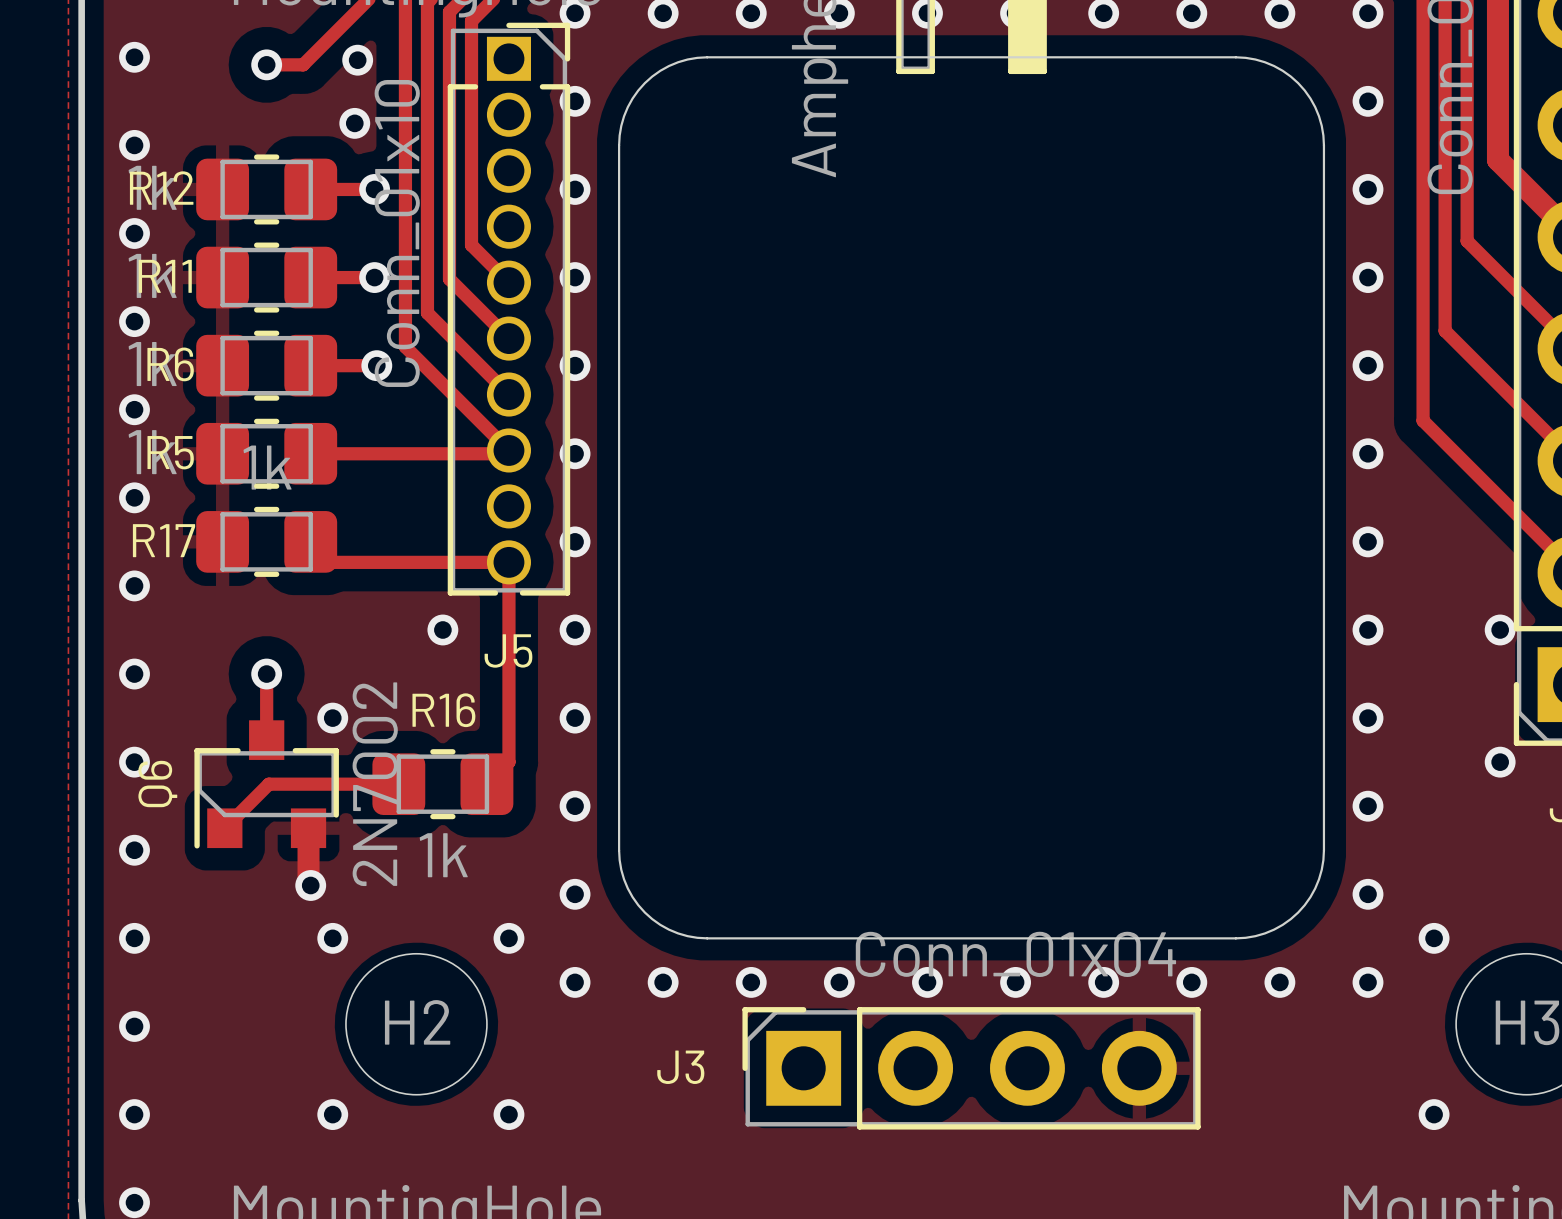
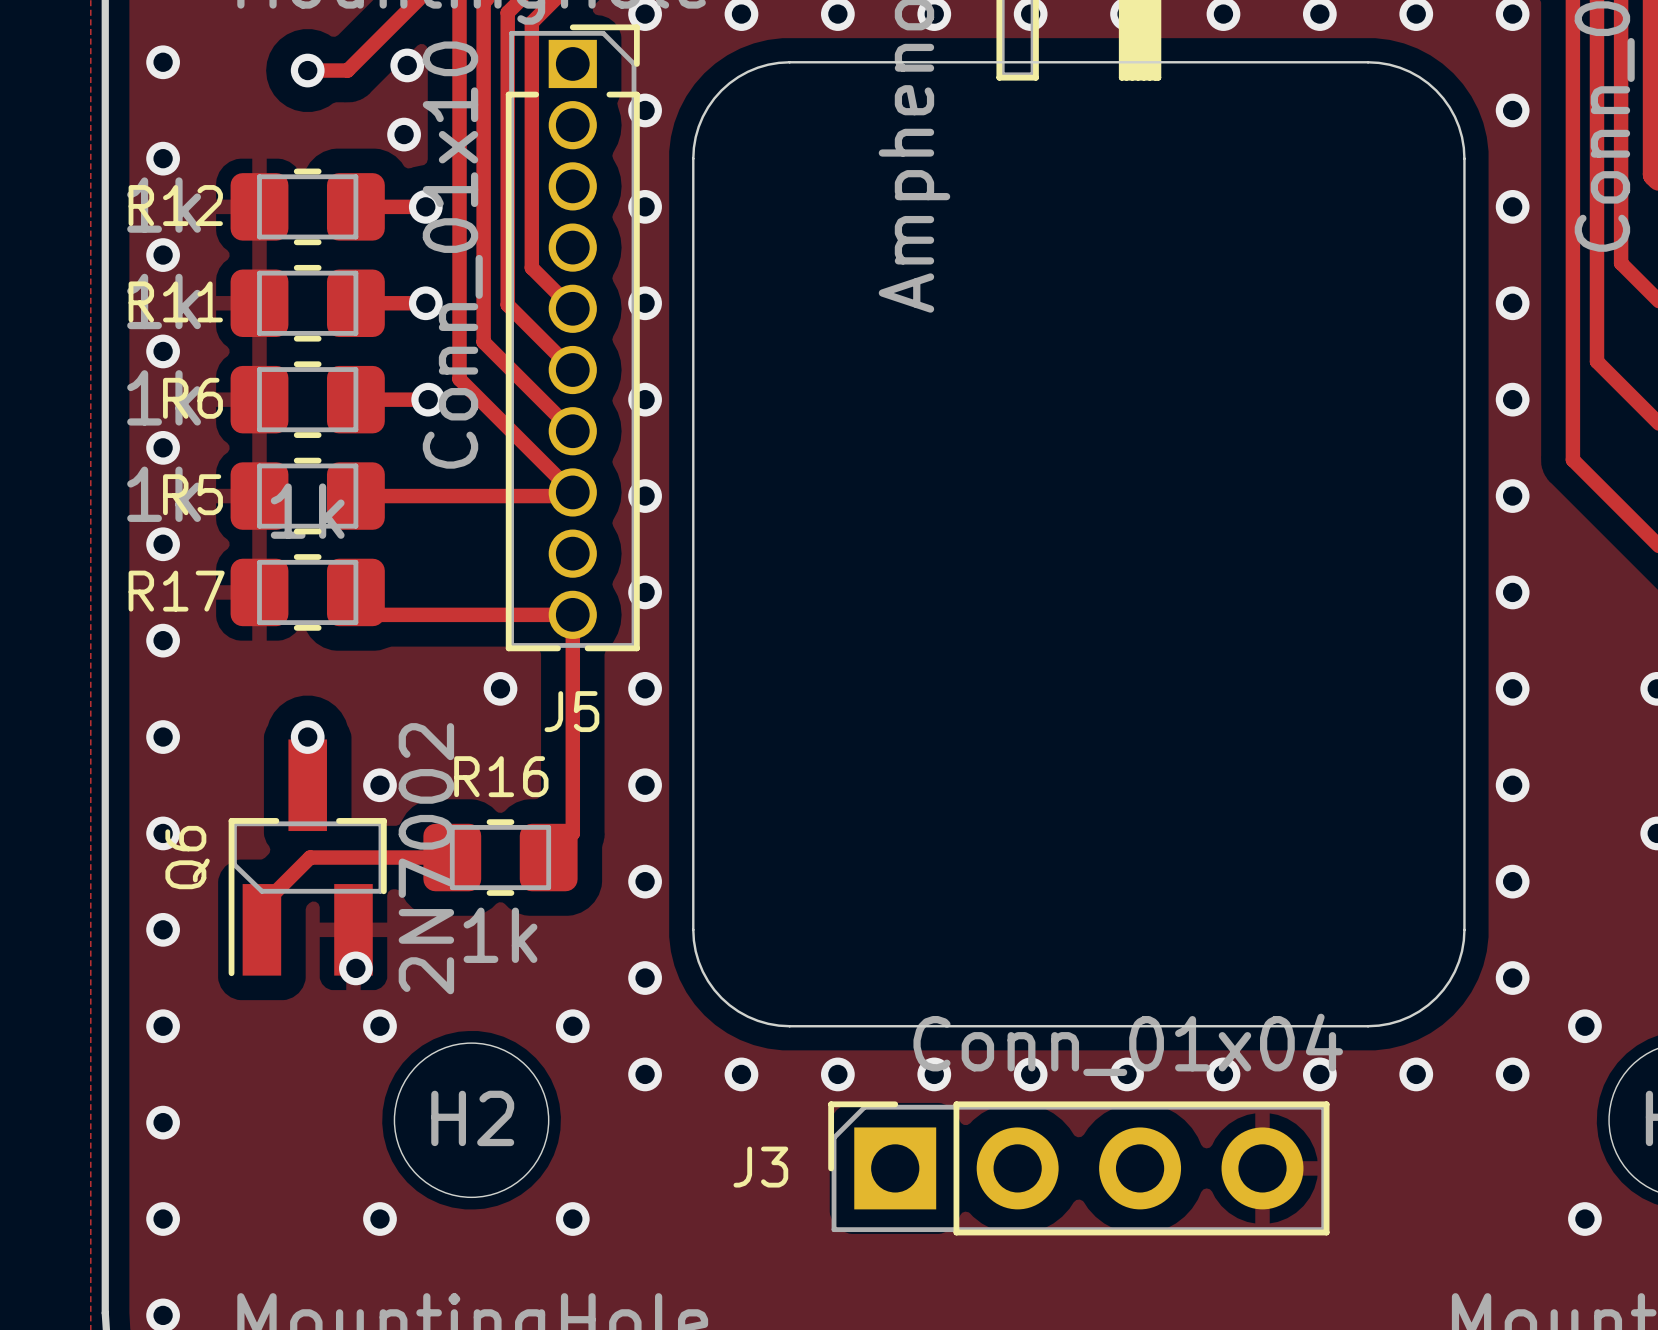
Q6 footprint: [194, 720, 339, 849] -> [228, 739, 387, 977]

